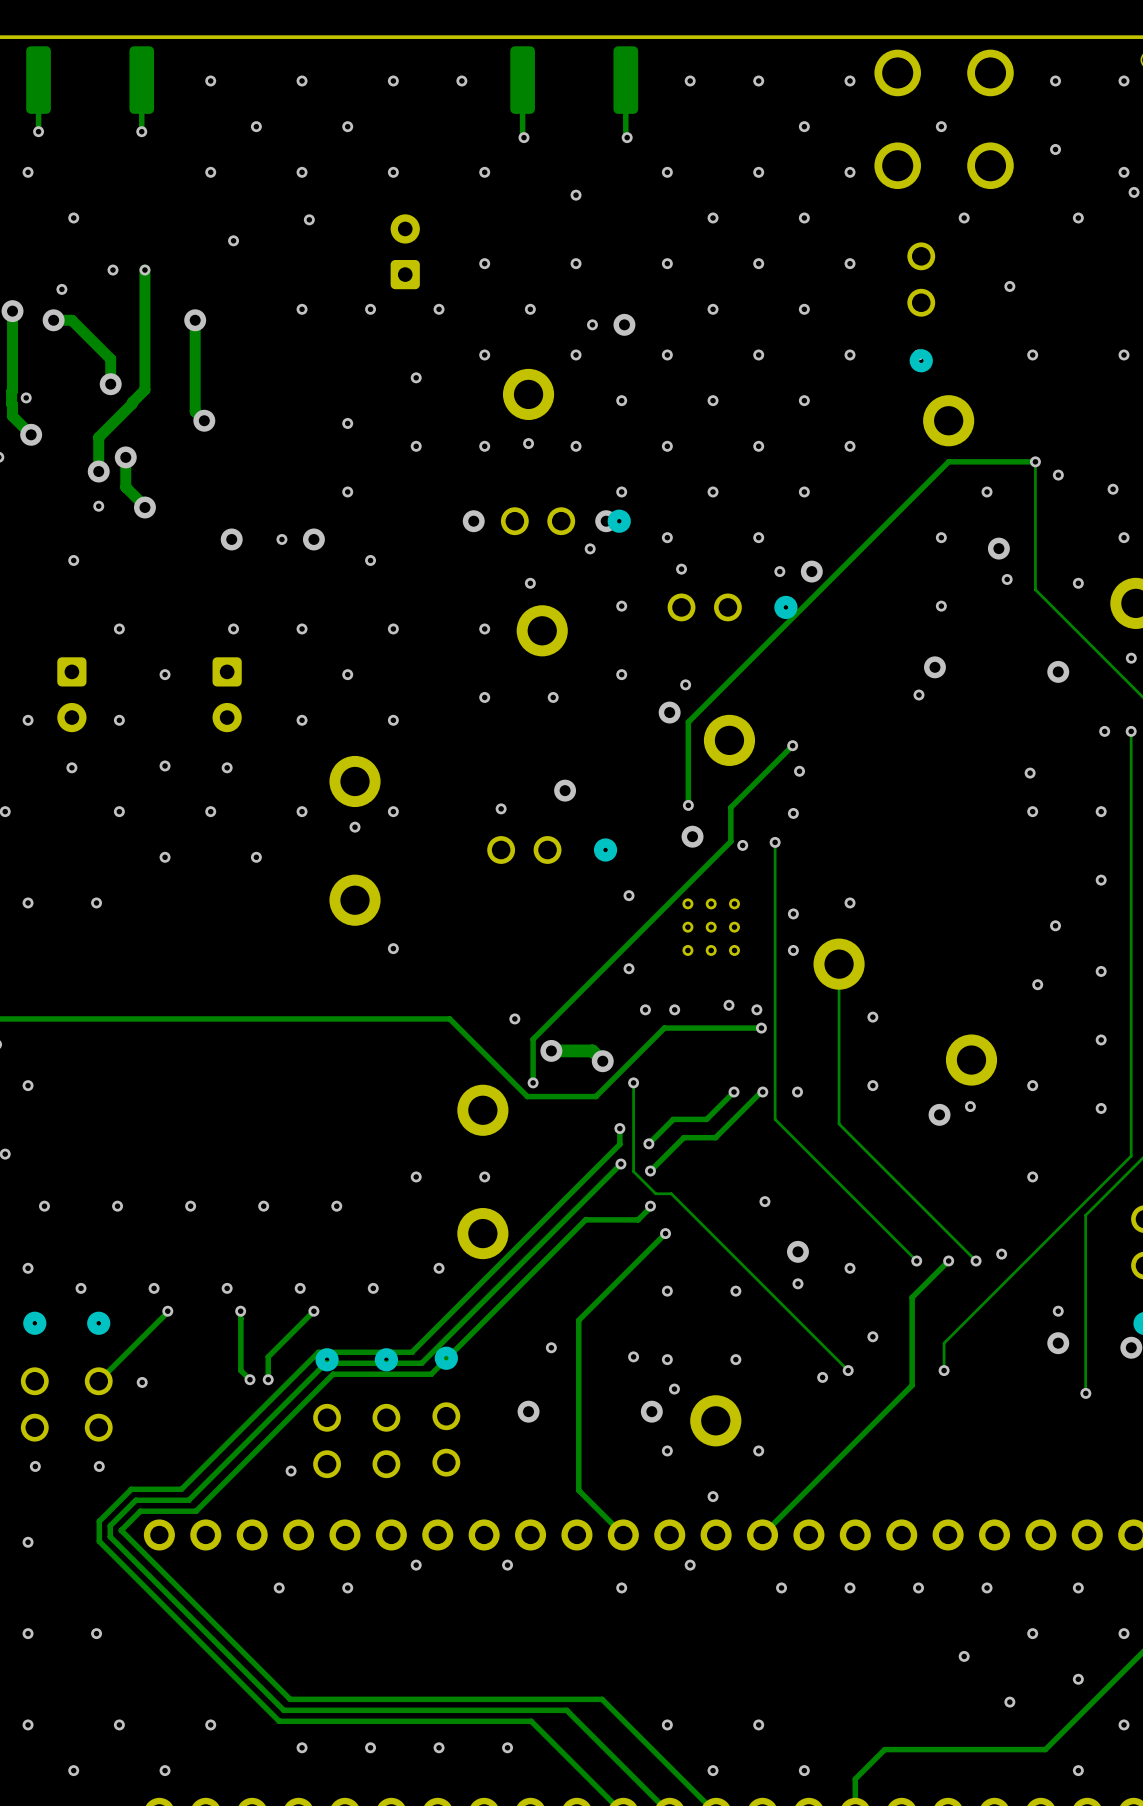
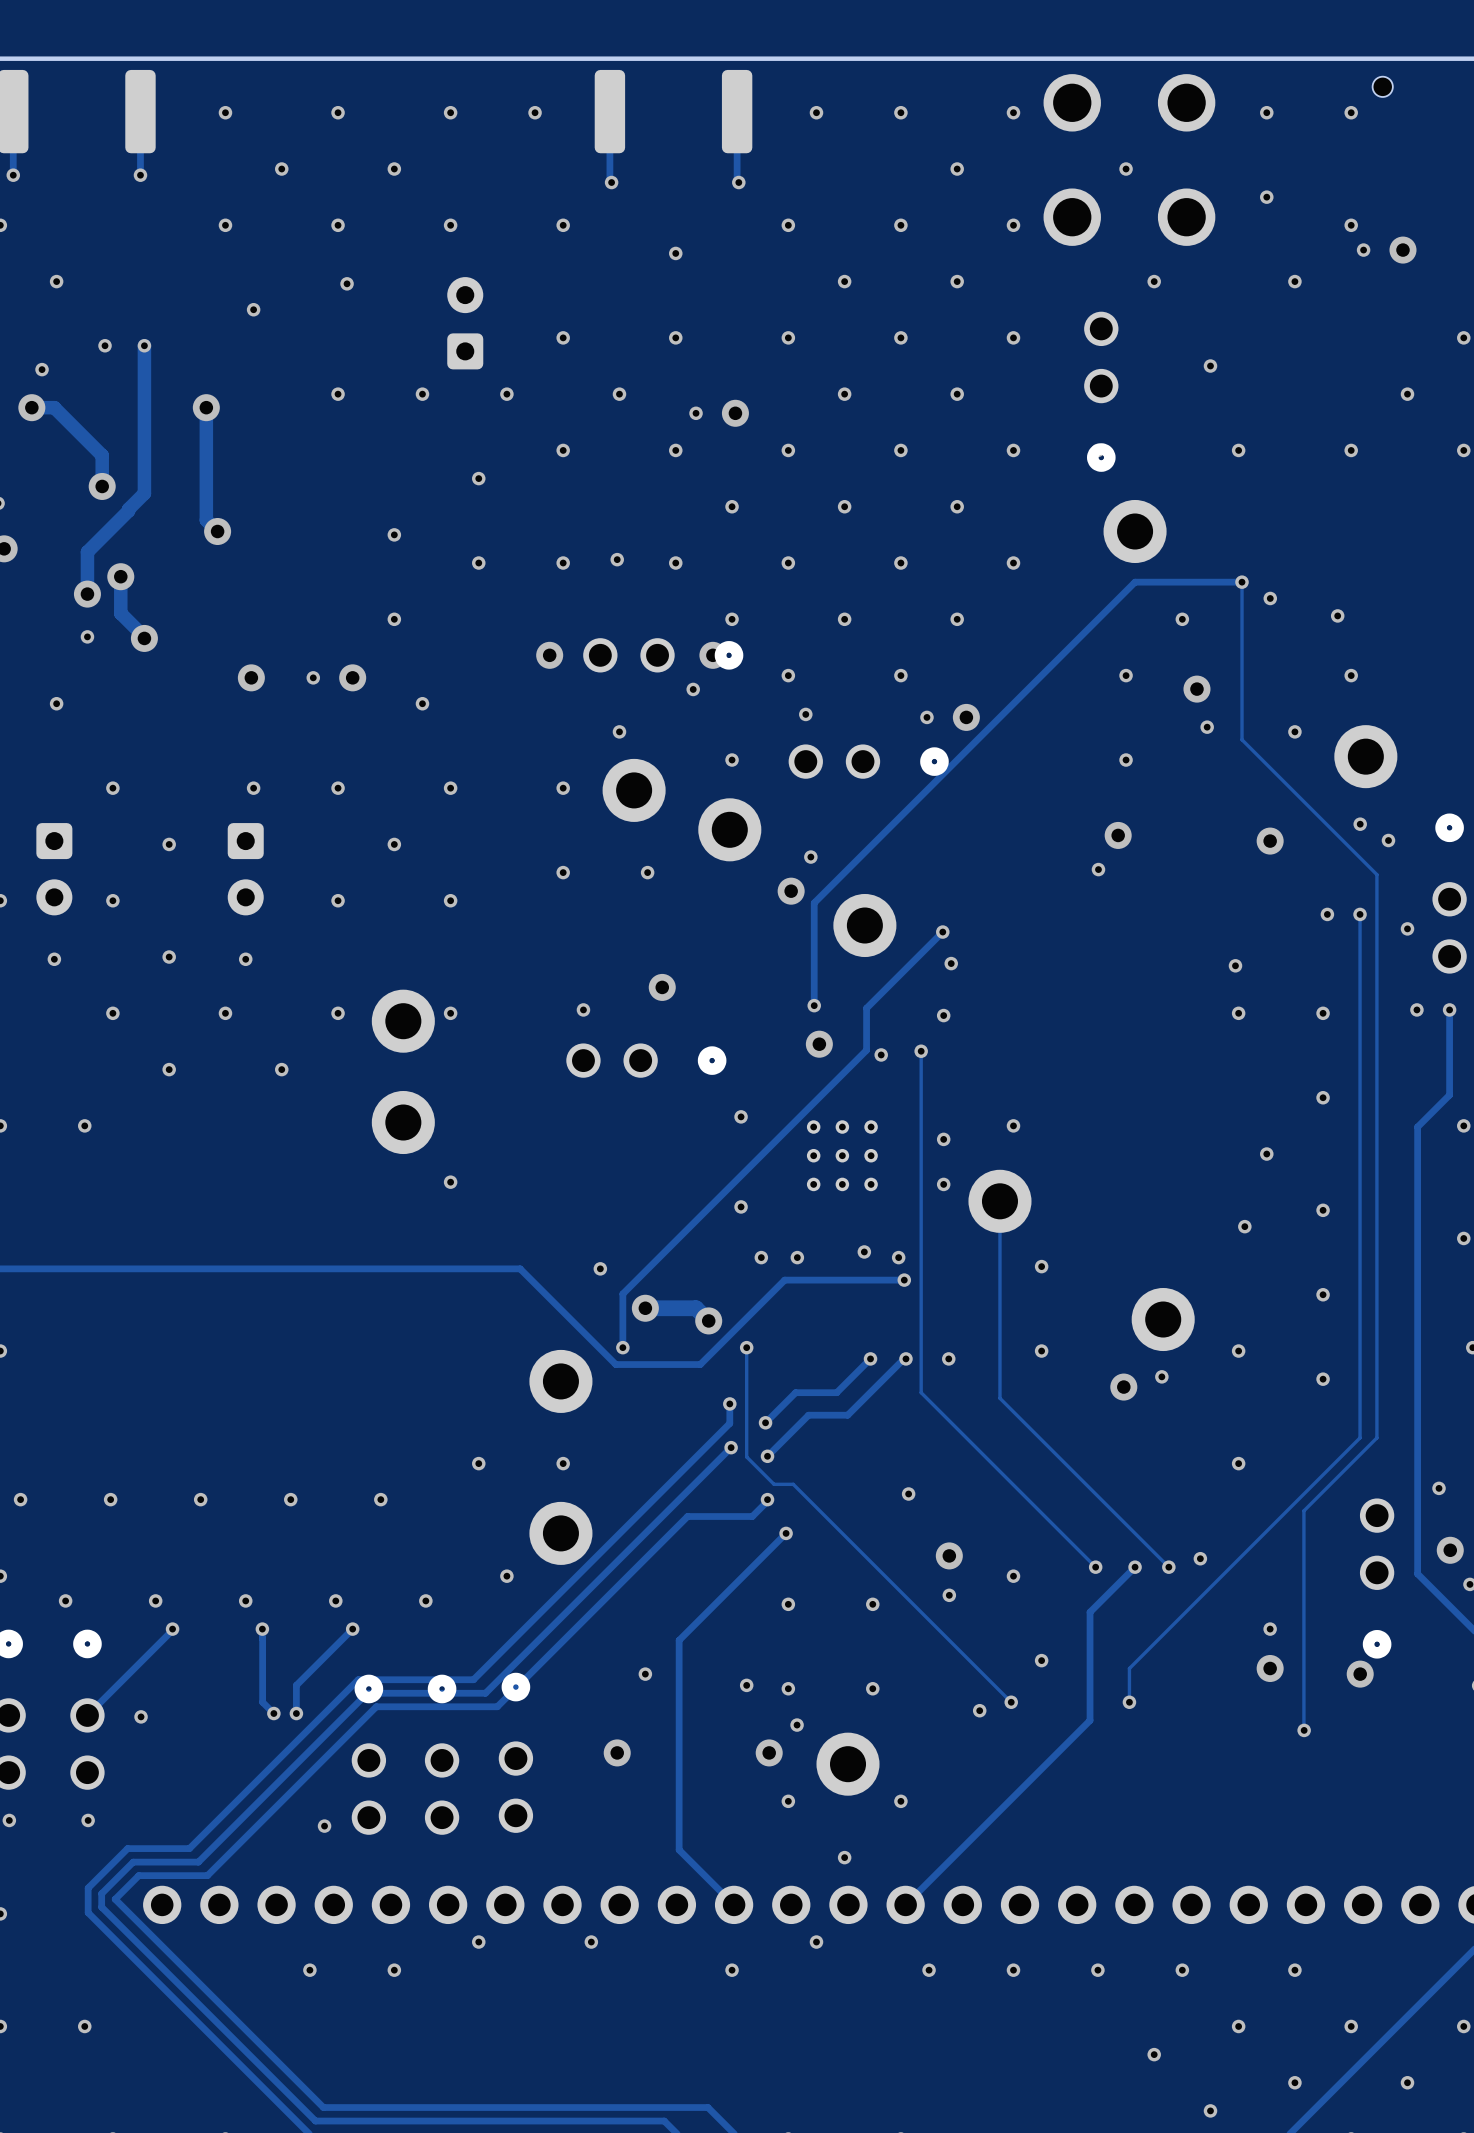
part: (528, 394) -> none
part: none -> (729, 829)
via: (621, 674) -> none
part position: (355, 781) -> (403, 1021)
via: (355, 827) -> none

